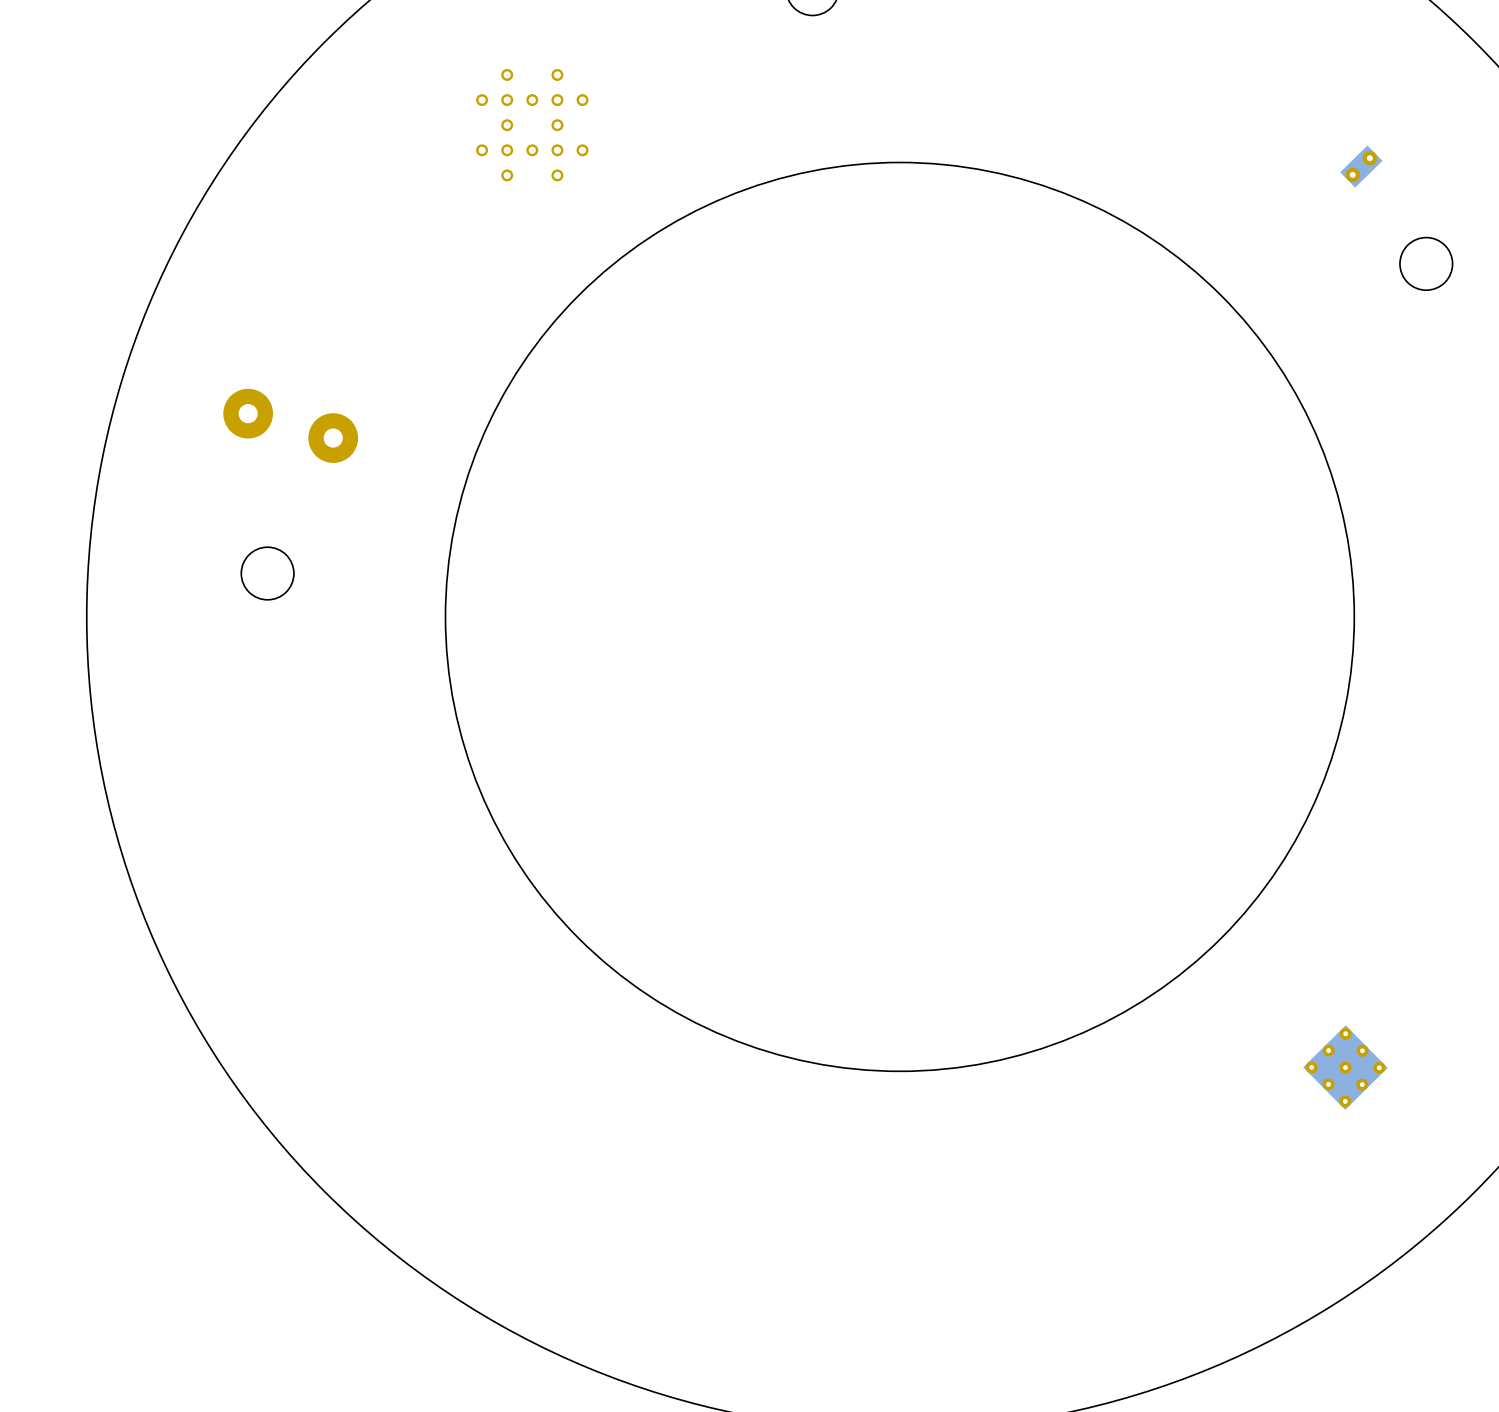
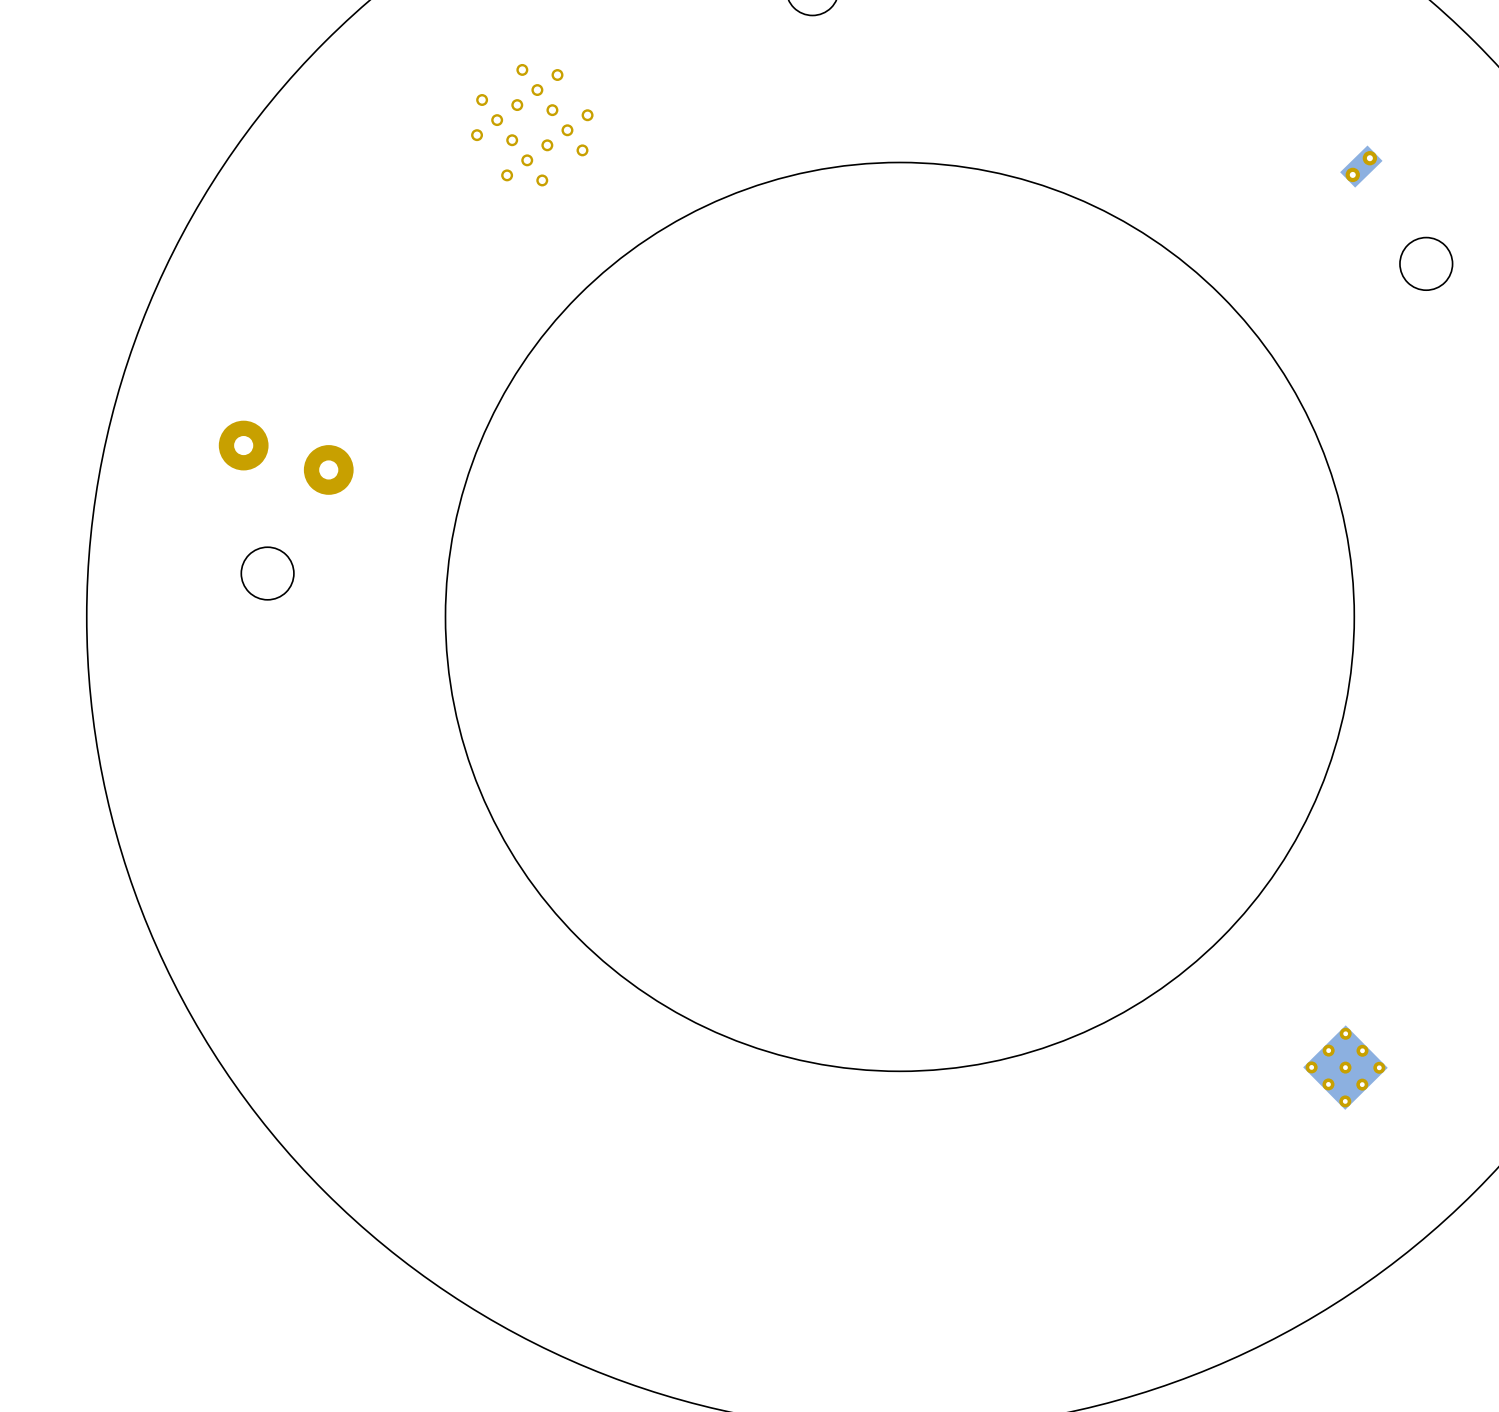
part rotation: 0° (532, 125) -> 36.8° counterclockwise (532, 125)
part position: (248, 413) -> (243, 445)
part position: (333, 438) -> (328, 469)

